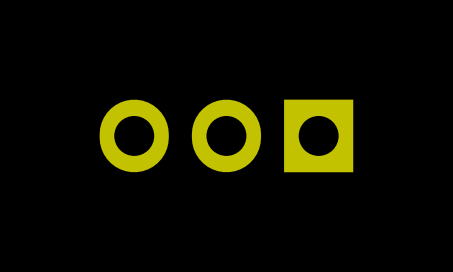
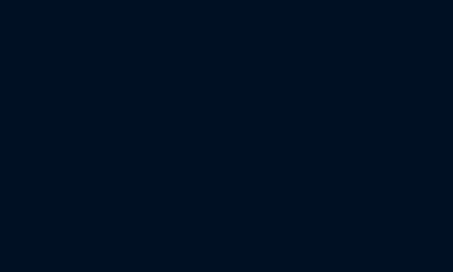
part: (226, 135) -> none

